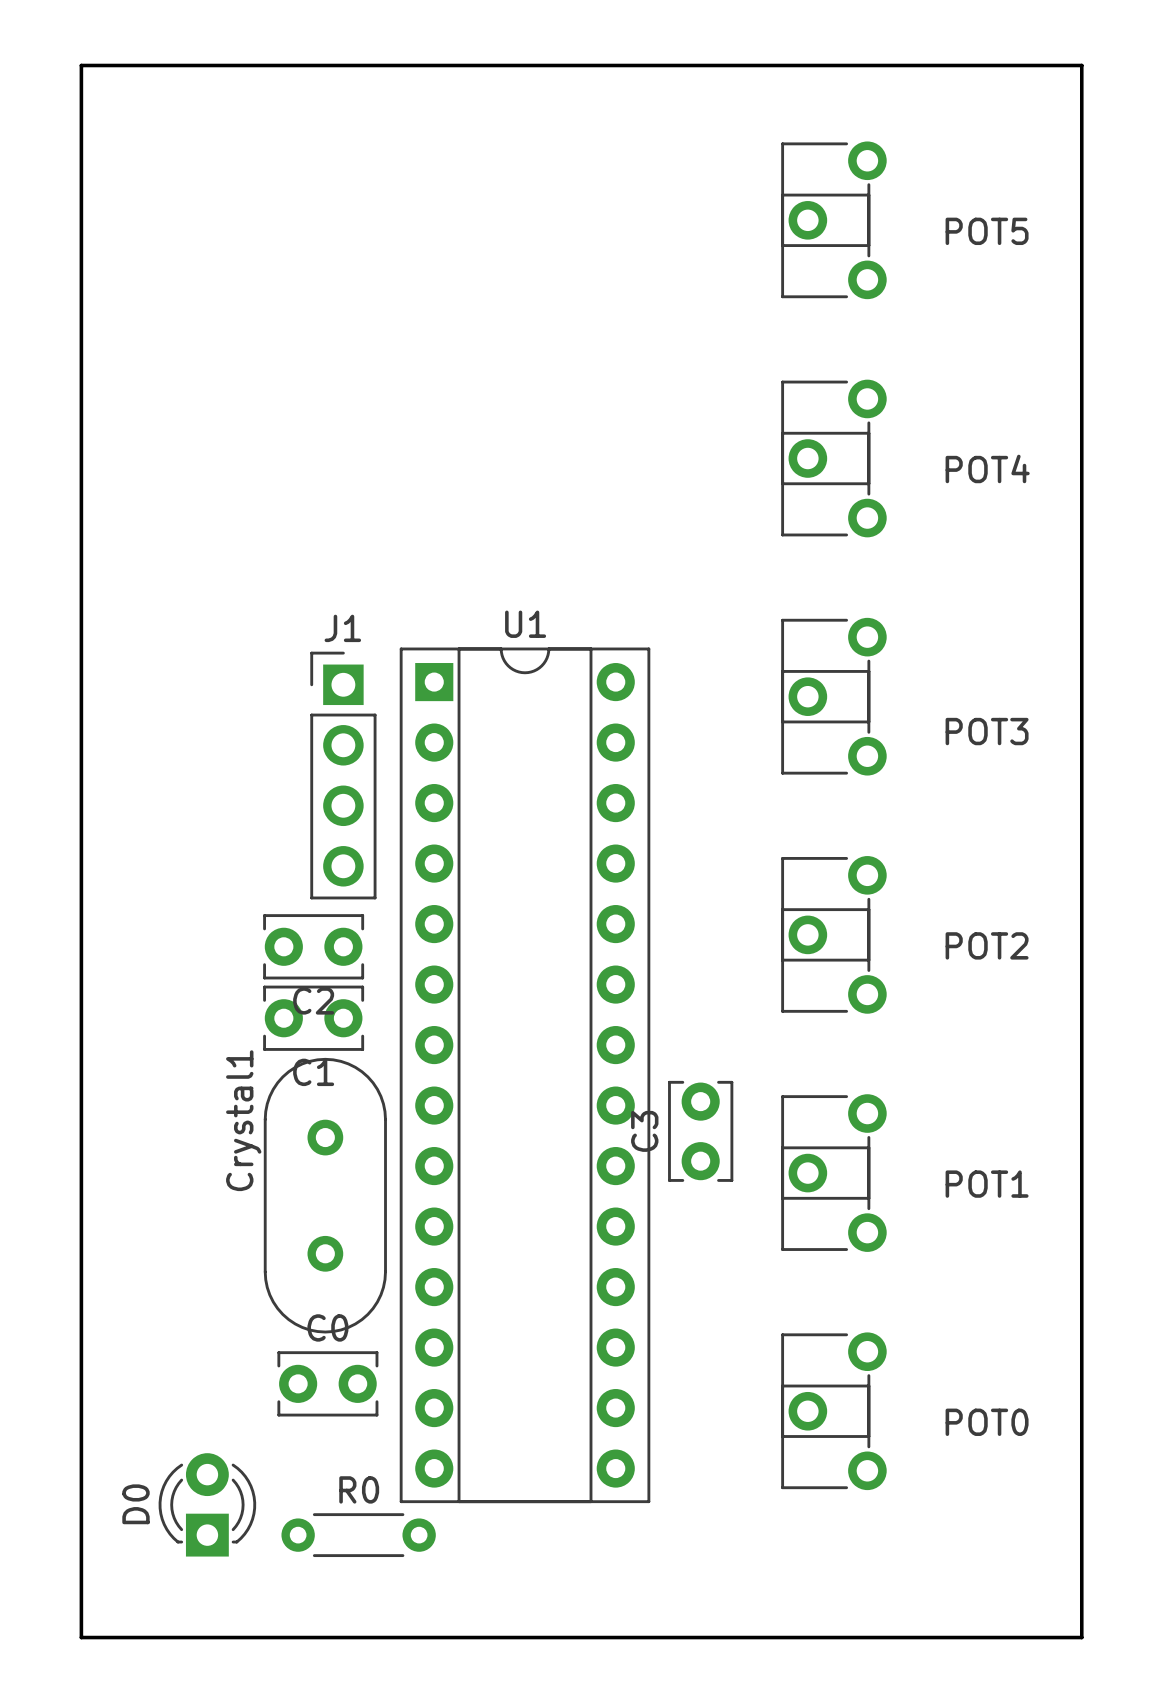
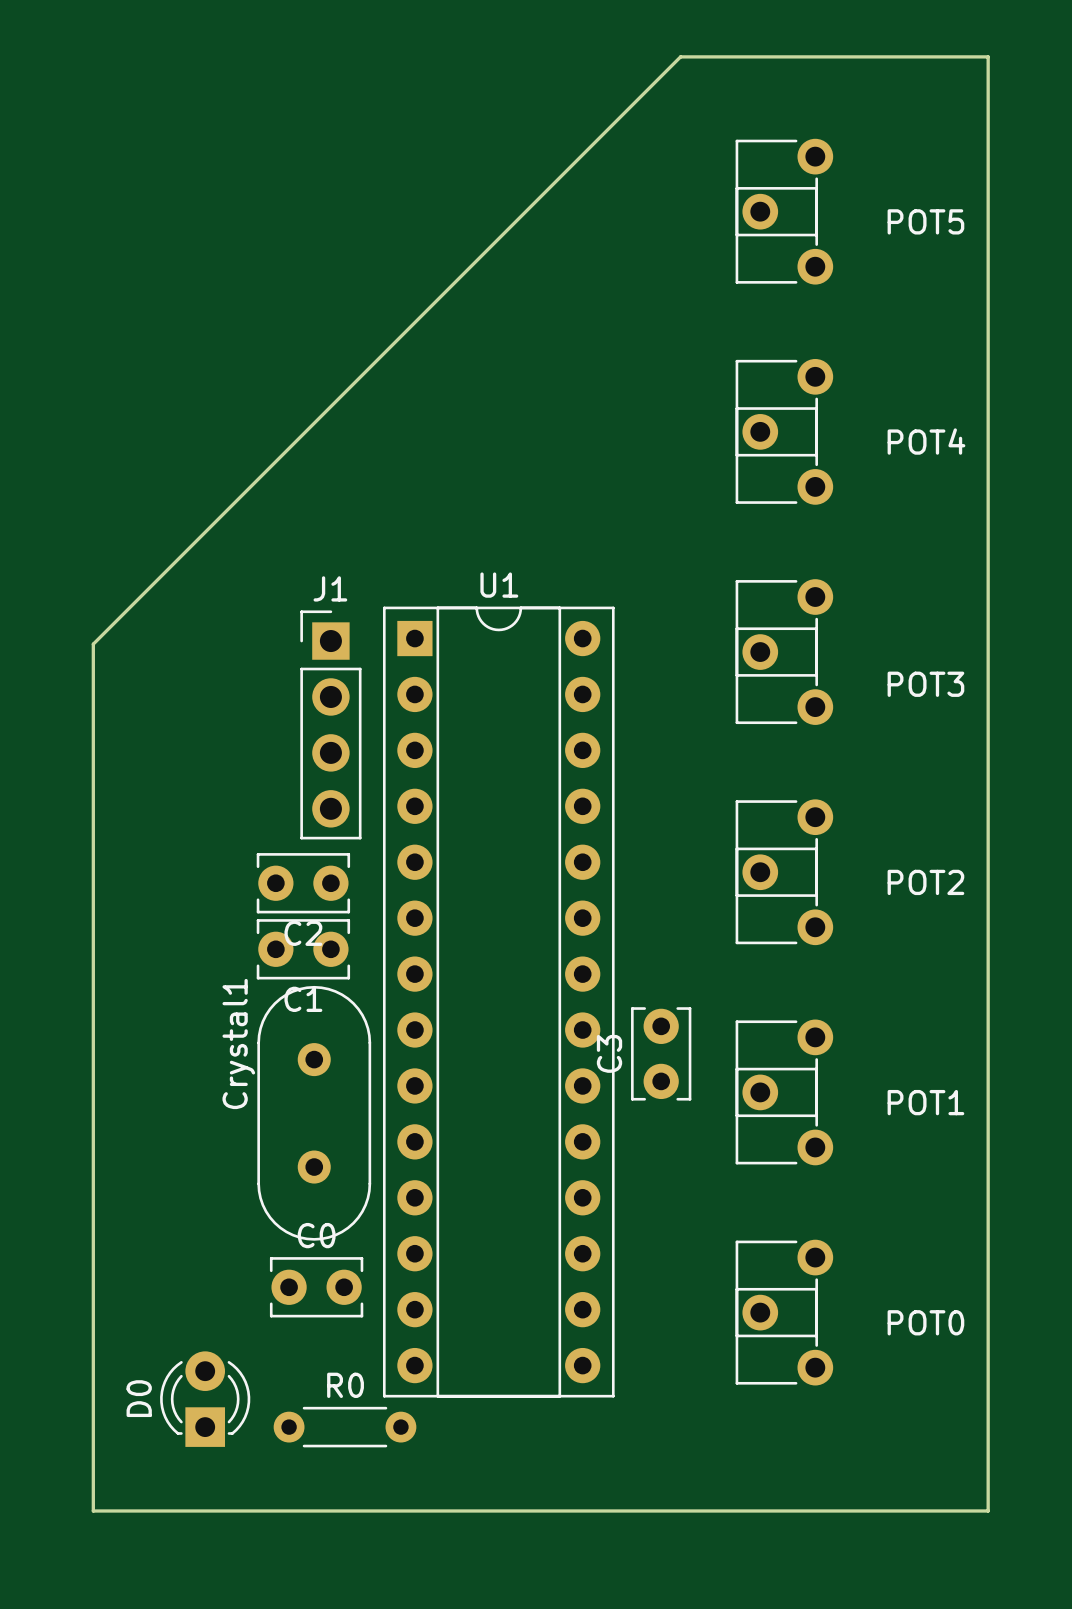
board edge: (81, 65) (81, 1637) (1081, 1637) (1081, 65) (81, 65) -> (680, 56) (93, 644) (93, 1510) (988, 1510) (988, 56) (680, 56)

